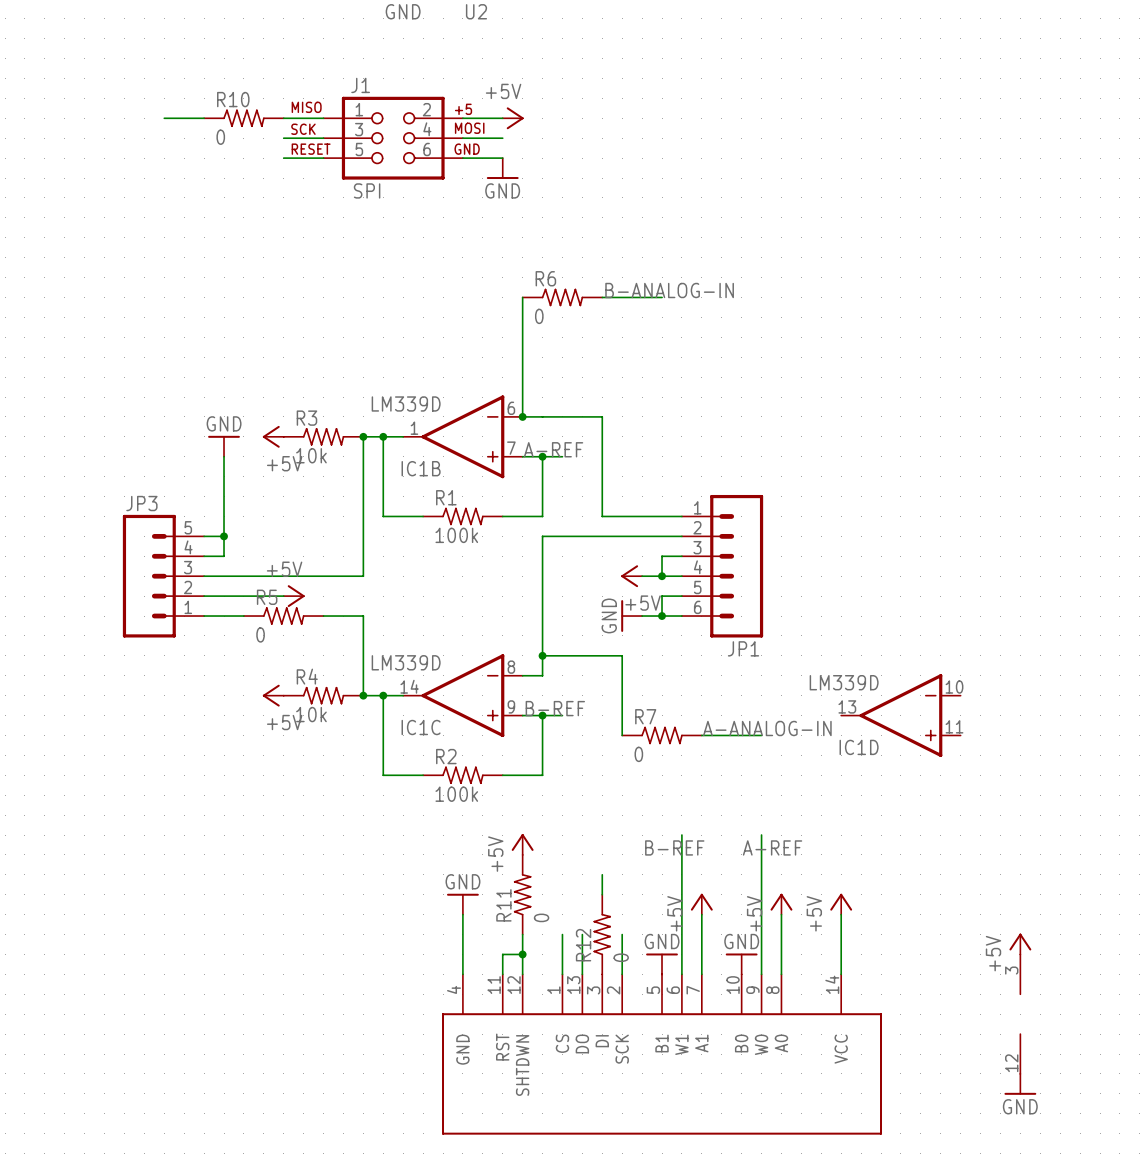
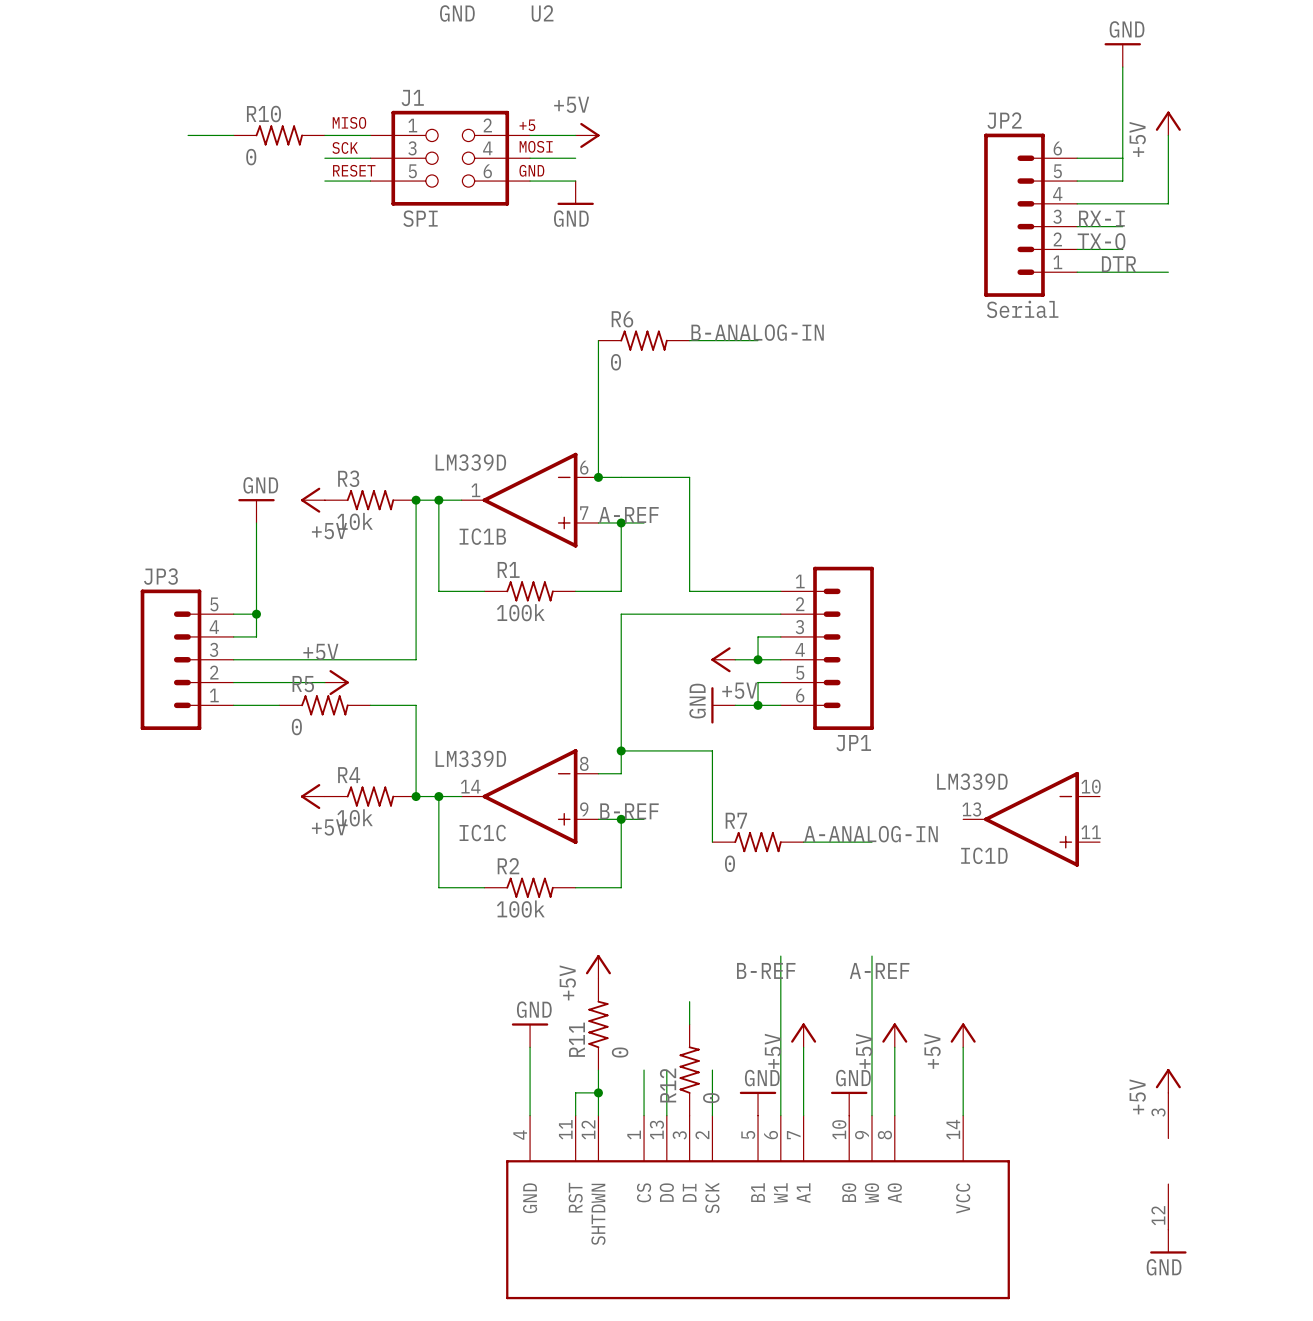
power symbol: none -> GND (1122, 55)
wire: none -> (1122, 67) (1122, 181) (1077, 181)
power symbol: none -> +5V (1168, 123)
wire: none -> (1168, 135) (1168, 203) (1077, 203)
wire: none -> (1077, 158) (1122, 158)
JP2: none -> Serial (1030, 215)
label: none -> RX-I (1101, 218)
wire: none -> (1077, 226) (1122, 226)
label: none -> TX-O (1101, 241)
wire: none -> (1077, 249) (1122, 249)
label: none -> DTR (1118, 264)
wire: none -> (1077, 272) (1168, 272)

